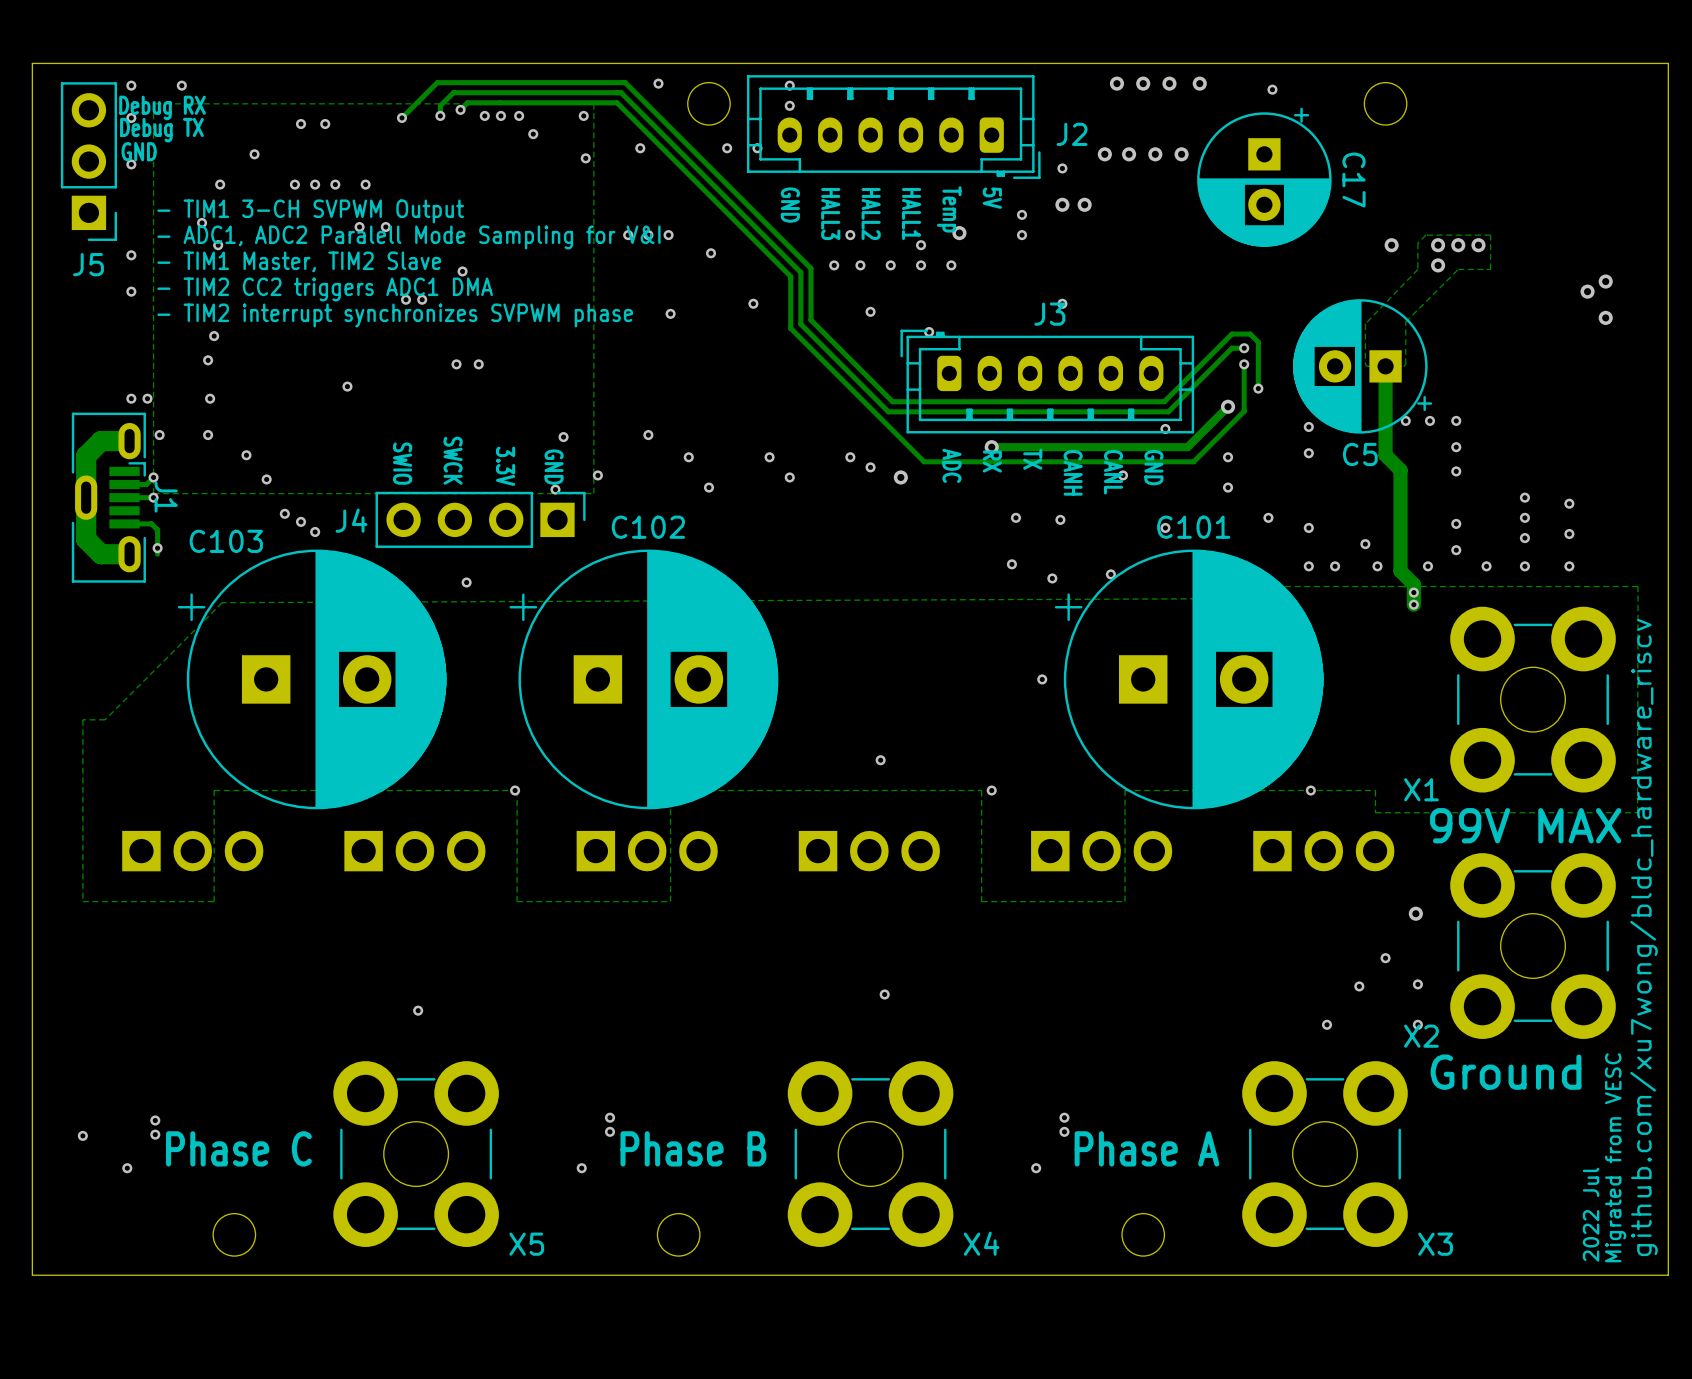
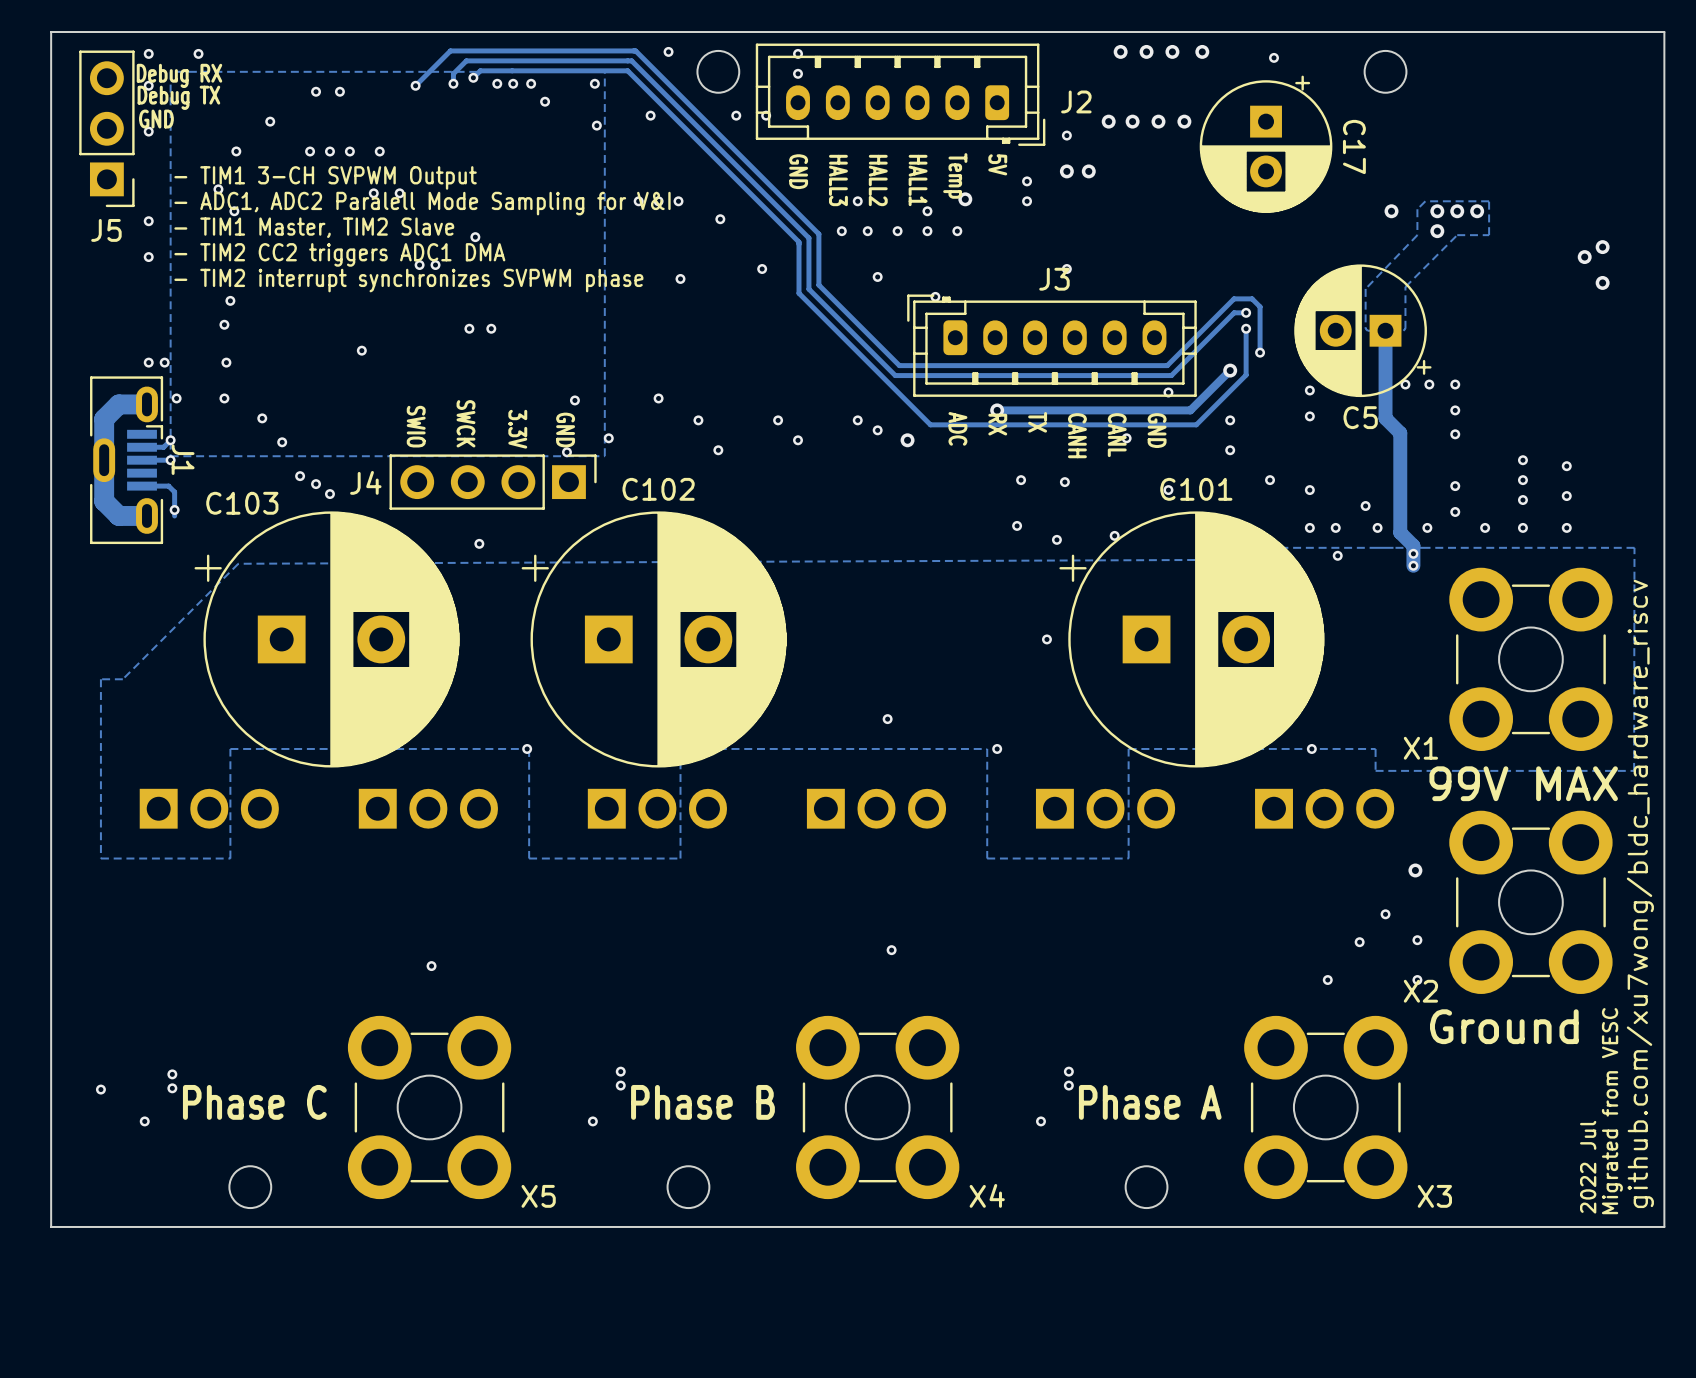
via: none -> (1337, 555)

